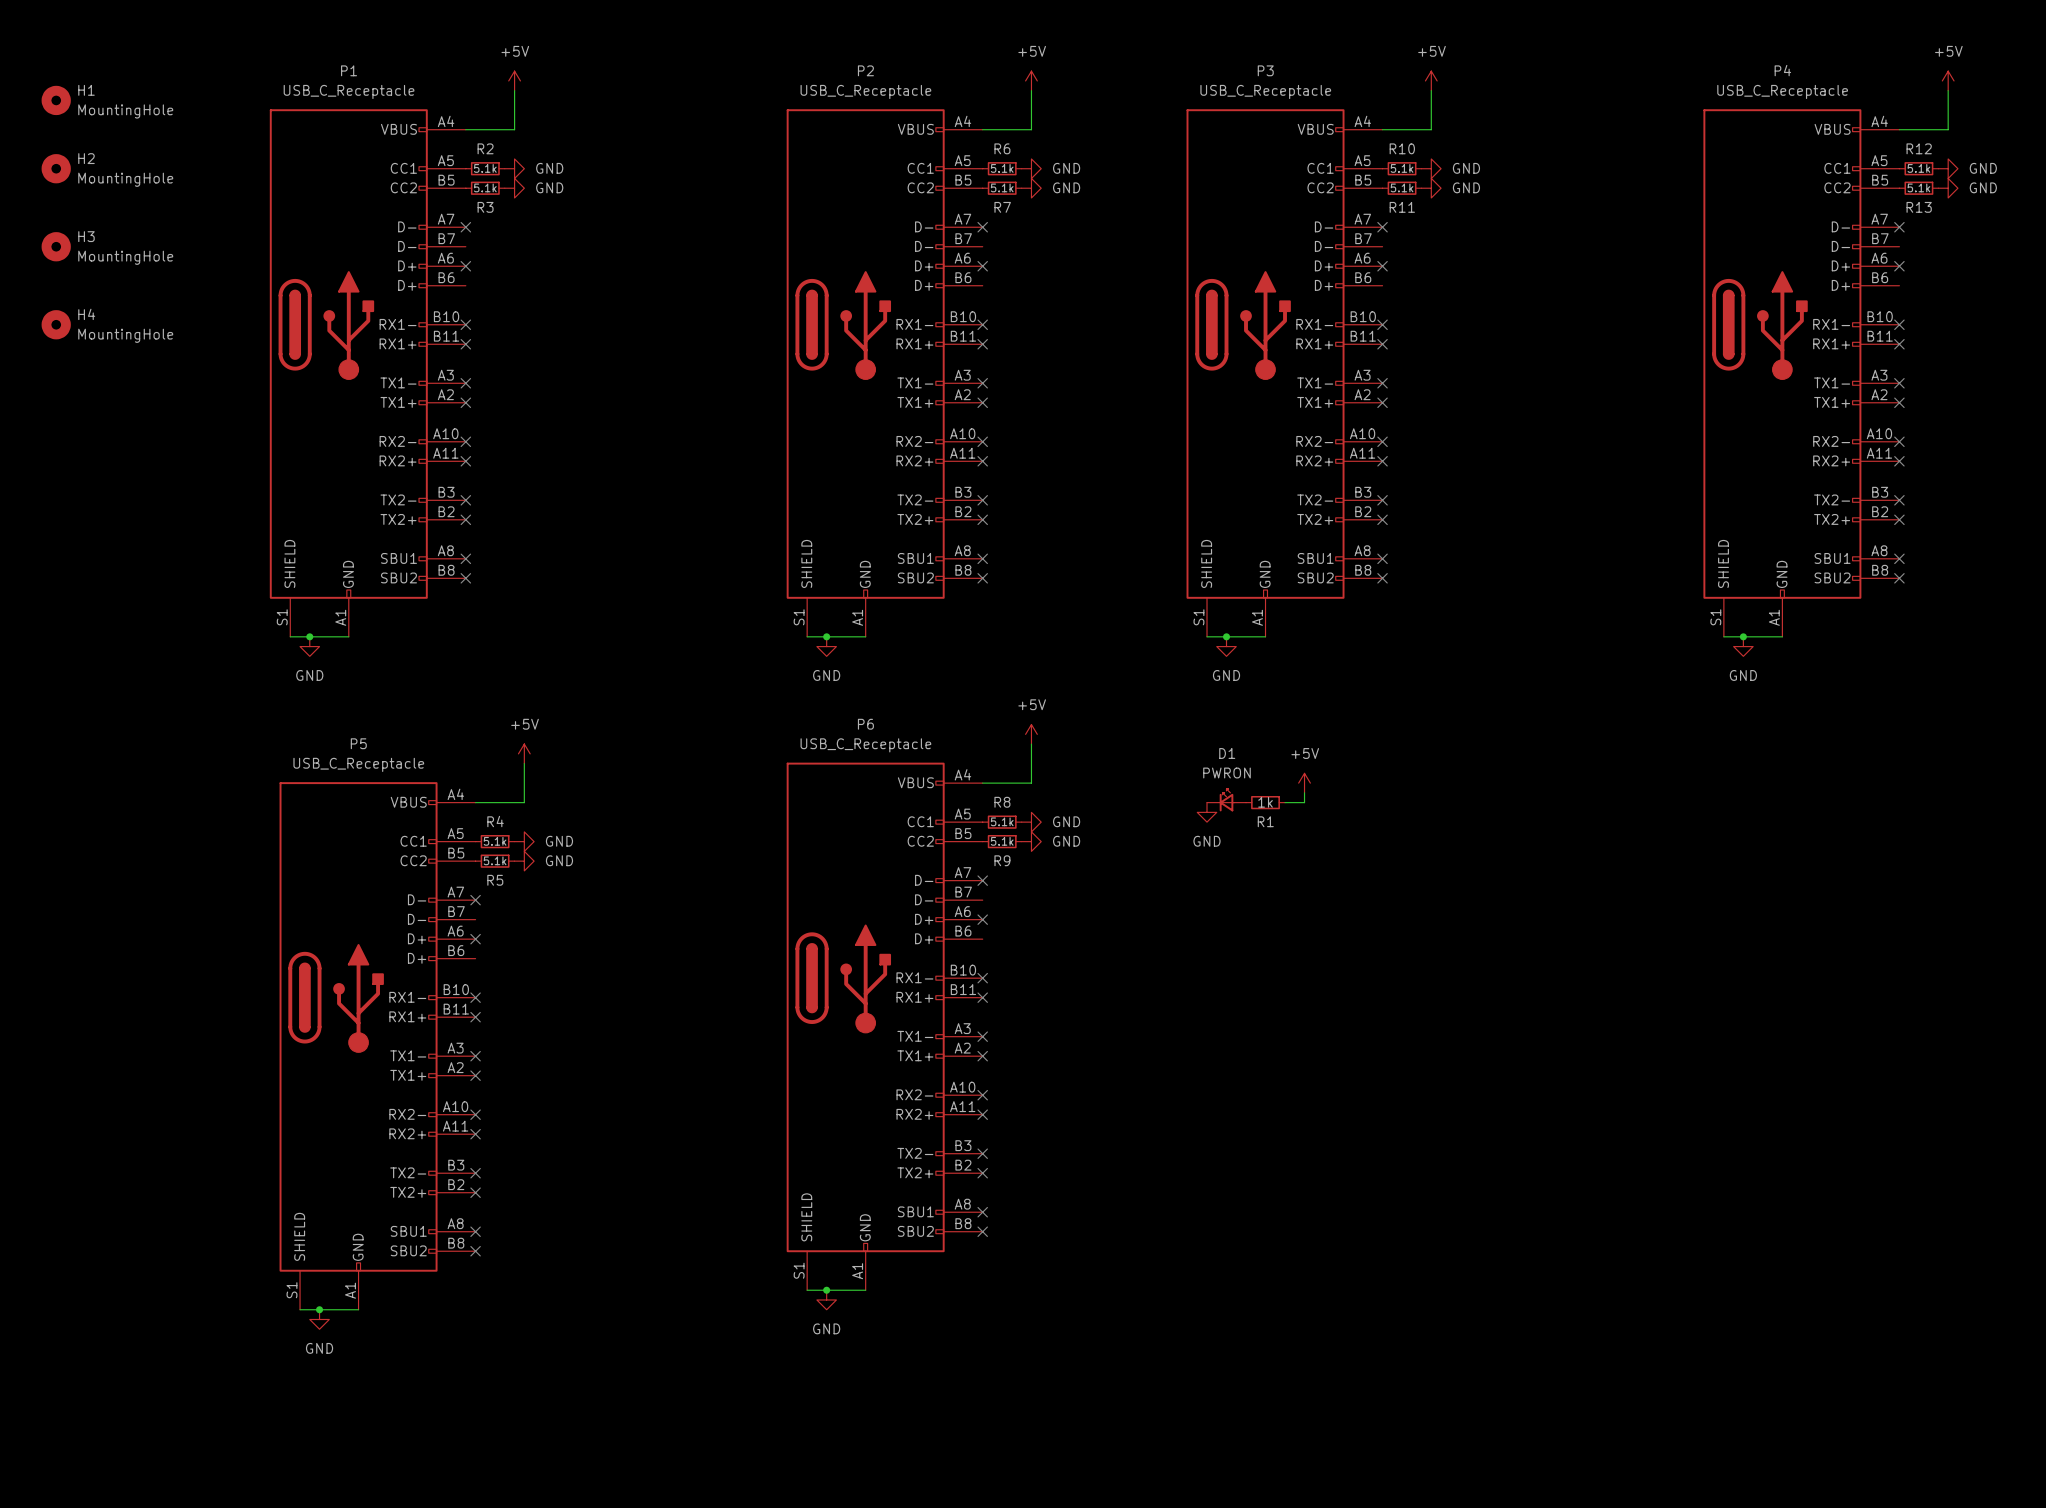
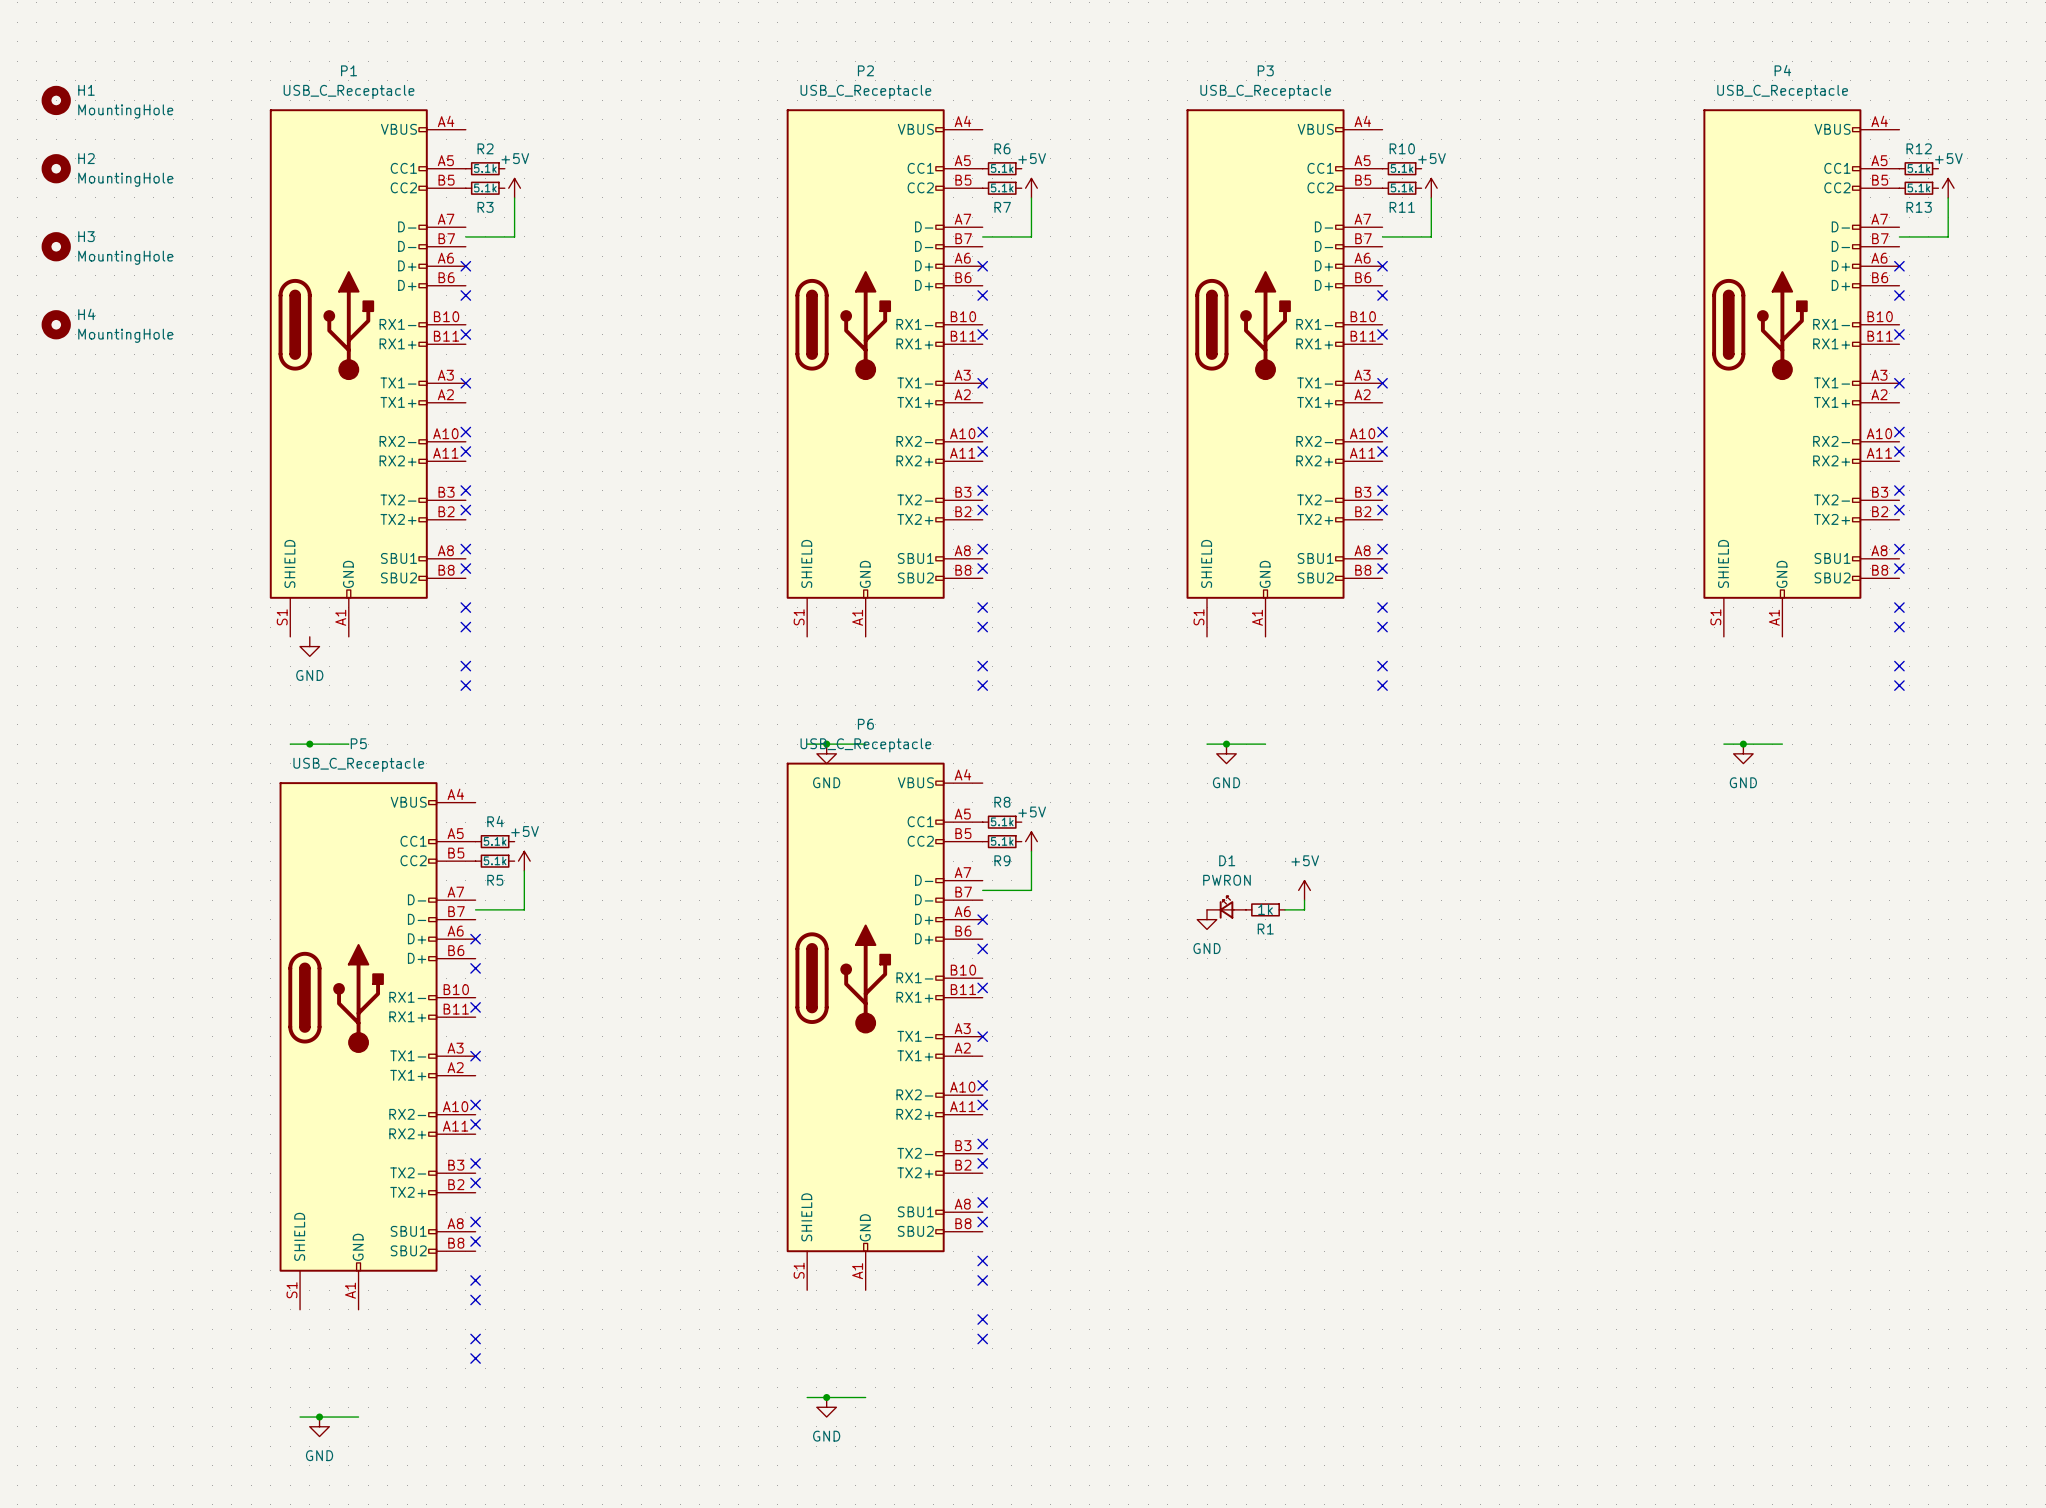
power symbol: +5V (514, 80) -> none
power symbol: +5V (1031, 80) -> none
power symbol: +5V (1431, 80) -> none
power symbol: +5V (1948, 80) -> none
wire: (514, 90) (514, 129) (465, 129) -> (514, 197) (514, 236) (465, 236)
wire: (1031, 90) (1031, 129) (982, 129) -> (1031, 197) (1031, 236) (982, 236)
wire: (1431, 90) (1431, 129) (1382, 129) -> (1431, 197) (1431, 236) (1382, 236)
wire: (1948, 90) (1948, 129) (1899, 129) -> (1948, 197) (1948, 236) (1899, 236)
power symbol: GND (514, 168) -> none
power symbol: GND (1031, 168) -> none
power symbol: GND (1431, 168) -> none
power symbol: GND (1948, 168) -> none
power symbol: GND (514, 188) -> +5V (514, 188)
power symbol: GND (1031, 188) -> +5V (1031, 188)
power symbol: GND (1431, 188) -> +5V (1431, 188)
power symbol: GND (1948, 188) -> +5V (1948, 188)
no-connect mark: (465, 227) -> none
no-connect mark: (982, 227) -> none
no-connect mark: (1382, 227) -> none
no-connect mark: (1899, 227) -> none
no-connect mark: none -> (465, 295)
no-connect mark: none -> (982, 295)
no-connect mark: none -> (1382, 295)
no-connect mark: none -> (1899, 295)
no-connect mark: (465, 324) -> none
no-connect mark: (982, 324) -> none
no-connect mark: (1382, 324) -> none
no-connect mark: (1899, 324) -> none
no-connect mark: none -> (465, 334)
no-connect mark: none -> (982, 334)
no-connect mark: none -> (1382, 334)
no-connect mark: none -> (1899, 334)
no-connect mark: (465, 344) -> none
no-connect mark: (982, 344) -> none
no-connect mark: (1382, 344) -> none
no-connect mark: (1899, 344) -> none
no-connect mark: (465, 402) -> none
no-connect mark: (982, 402) -> none
no-connect mark: (1382, 402) -> none
no-connect mark: (1899, 402) -> none
no-connect mark: none -> (465, 432)
no-connect mark: none -> (982, 432)
no-connect mark: none -> (1382, 432)
no-connect mark: none -> (1899, 432)
no-connect mark: (465, 441) -> none
no-connect mark: (982, 441) -> none
no-connect mark: (1382, 441) -> none
no-connect mark: (1899, 441) -> none
no-connect mark: none -> (465, 451)
no-connect mark: none -> (982, 451)
no-connect mark: none -> (1382, 451)
no-connect mark: none -> (1899, 451)
no-connect mark: (465, 461) -> none
no-connect mark: (982, 461) -> none
no-connect mark: (1382, 461) -> none
no-connect mark: (1899, 461) -> none
no-connect mark: none -> (465, 490)
no-connect mark: none -> (982, 490)
no-connect mark: none -> (1382, 490)
no-connect mark: none -> (1899, 490)
no-connect mark: (465, 500) -> none
no-connect mark: (982, 500) -> none
no-connect mark: (1382, 500) -> none
no-connect mark: (1899, 500) -> none
no-connect mark: none -> (465, 510)
no-connect mark: none -> (982, 510)
no-connect mark: none -> (1382, 510)
no-connect mark: none -> (1899, 510)
no-connect mark: (465, 519) -> none
no-connect mark: (982, 519) -> none
no-connect mark: (1382, 519) -> none
no-connect mark: (1899, 519) -> none
no-connect mark: none -> (465, 549)
no-connect mark: none -> (982, 549)
no-connect mark: none -> (1382, 549)
no-connect mark: none -> (1899, 549)
no-connect mark: (465, 558) -> none
no-connect mark: (982, 558) -> none
no-connect mark: (1382, 558) -> none
no-connect mark: (1899, 558) -> none
no-connect mark: none -> (465, 568)
no-connect mark: none -> (982, 568)
no-connect mark: none -> (1382, 568)
no-connect mark: none -> (1899, 568)
no-connect mark: (465, 578) -> none
no-connect mark: (982, 578) -> none
no-connect mark: (1382, 578) -> none
no-connect mark: (1899, 578) -> none
no-connect mark: none -> (465, 607)
no-connect mark: none -> (982, 607)
no-connect mark: none -> (1382, 607)
no-connect mark: none -> (1899, 607)
no-connect mark: none -> (465, 627)
no-connect mark: none -> (982, 627)
no-connect mark: none -> (1382, 627)
no-connect mark: none -> (1899, 627)
wire: (290, 636) (348, 636) -> (290, 744) (348, 744)
junction: (309, 636) -> none
wire: (807, 636) (865, 636) -> (807, 744) (865, 744)
junction: (826, 636) -> none
wire: (1207, 636) (1265, 636) -> (1207, 744) (1265, 744)
junction: (1226, 636) -> none
wire: (1723, 636) (1782, 636) -> (1723, 744) (1782, 744)
junction: (1743, 636) -> none
power symbol position: GND (826, 646) -> GND (826, 753)
power symbol: GND (1226, 646) -> none
power symbol position: GND (1743, 646) -> GND (1743, 753)
no-connect mark: none -> (465, 666)
no-connect mark: none -> (982, 666)
no-connect mark: none -> (1382, 666)
no-connect mark: none -> (1899, 666)
no-connect mark: none -> (465, 685)
no-connect mark: none -> (982, 685)
no-connect mark: none -> (1382, 685)
no-connect mark: none -> (1899, 685)
power symbol: +5V (1031, 734) -> none
junction: none -> (309, 744)
junction: none -> (826, 744)
wire: (1031, 744) (1031, 783) (982, 783) -> (1031, 851) (1031, 890) (982, 890)
junction: none -> (1226, 744)
junction: none -> (1743, 744)
power symbol: +5V (524, 753) -> none
power symbol: none -> GND (1226, 753)
wire: (524, 763) (524, 802) (475, 802) -> (524, 870) (524, 909) (475, 909)
power symbol position: +5V (1304, 783) -> +5V (1304, 890)
wire: (1304, 792) (1304, 802) (1285, 802) -> (1304, 900) (1304, 909) (1285, 909)
D1 position: (1226, 800) -> (1226, 907)
R1 position: (1265, 802) -> (1265, 909)
power symbol: GND (1207, 812) -> none
power symbol: GND (1031, 822) -> none
power symbol: GND (524, 841) -> none
power symbol: GND (1031, 841) -> +5V (1031, 841)
power symbol: GND (524, 861) -> +5V (524, 861)
no-connect mark: (982, 880) -> none
no-connect mark: (475, 900) -> none
power symbol: none -> GND (1207, 919)
no-connect mark: none -> (982, 948)
no-connect mark: none -> (475, 968)
no-connect mark: (982, 978) -> none
no-connect mark: none -> (982, 987)
no-connect mark: (475, 997) -> none
no-connect mark: (982, 997) -> none
no-connect mark: none -> (475, 1007)
no-connect mark: (475, 1017) -> none
no-connect mark: (982, 1056) -> none
no-connect mark: (475, 1075) -> none
no-connect mark: none -> (982, 1085)
no-connect mark: (982, 1095) -> none
no-connect mark: none -> (475, 1104)
no-connect mark: none -> (982, 1104)
no-connect mark: (475, 1114) -> none
no-connect mark: (982, 1114) -> none
no-connect mark: none -> (475, 1124)
no-connect mark: (475, 1134) -> none
no-connect mark: none -> (982, 1143)
no-connect mark: (982, 1153) -> none
no-connect mark: none -> (475, 1163)
no-connect mark: none -> (982, 1163)
no-connect mark: (475, 1173) -> none
no-connect mark: (982, 1173) -> none
no-connect mark: none -> (475, 1182)
no-connect mark: (475, 1192) -> none
no-connect mark: none -> (982, 1202)
no-connect mark: (982, 1212) -> none
no-connect mark: none -> (475, 1221)
no-connect mark: none -> (982, 1221)
no-connect mark: (475, 1231) -> none
no-connect mark: (982, 1231) -> none
no-connect mark: none -> (475, 1241)
no-connect mark: (475, 1251) -> none
no-connect mark: none -> (982, 1260)
no-connect mark: none -> (475, 1280)
no-connect mark: none -> (982, 1280)
wire: (807, 1290) (865, 1290) -> (807, 1397) (865, 1397)
junction: (826, 1290) -> none
no-connect mark: none -> (475, 1299)
power symbol position: GND (826, 1299) -> GND (826, 1407)
wire: (300, 1309) (358, 1309) -> (300, 1417) (358, 1417)
junction: (319, 1309) -> none
power symbol position: GND (319, 1319) -> GND (319, 1426)
no-connect mark: none -> (982, 1319)
no-connect mark: none -> (475, 1339)
no-connect mark: none -> (982, 1339)
no-connect mark: none -> (475, 1358)
junction: none -> (826, 1397)
junction: none -> (319, 1417)

